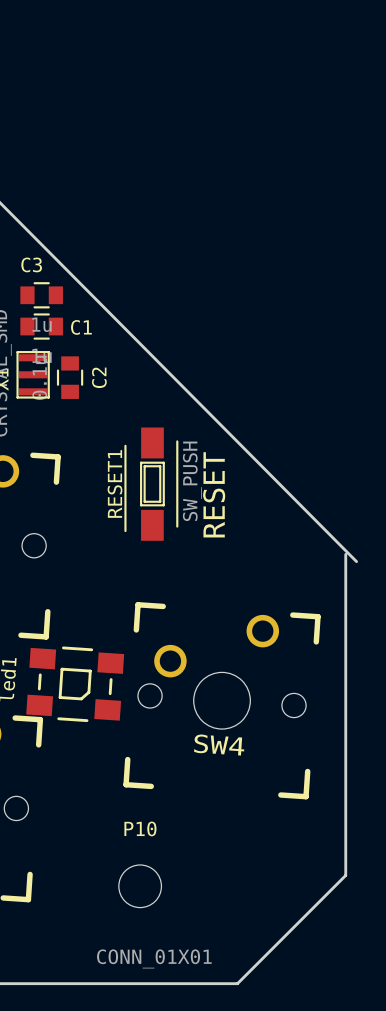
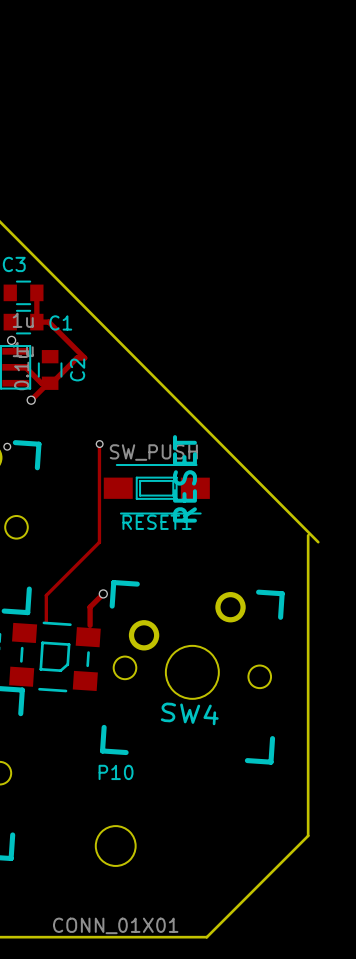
track: none -> (36, 292) (36, 322) (48, 322) (84, 358) (77, 358) (51, 383) (41, 383) (25, 367) (15, 367)
via: none -> (11, 340)
track: none -> (48, 383) (31, 400)
via: none -> (31, 400)
track: none -> (99, 444) (99, 542) (46, 595) (46, 622)
via: none -> (99, 444)
via: none -> (7, 446)
RESET1 rotation: 0° (151, 484) -> 90° counterclockwise (156, 489)
track: none -> (103, 593) (90, 607) (90, 625)
via: none -> (103, 593)
P10 name position: P10 (140, 828) -> P10 (116, 772)
P10 value position: CONN_01X01 (154, 958) -> CONN_01X01 (115, 925)

